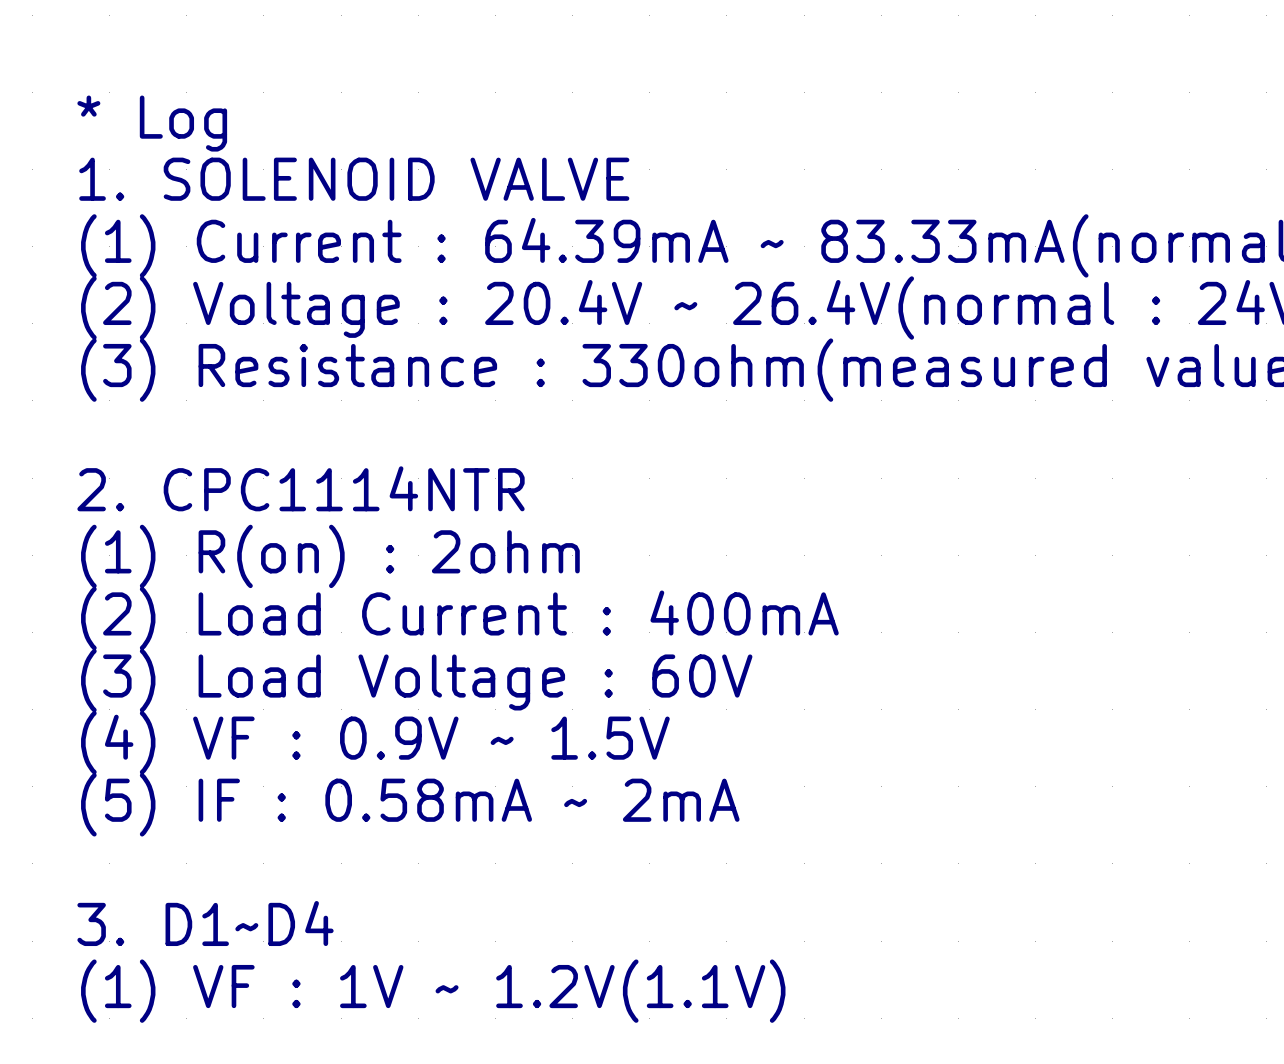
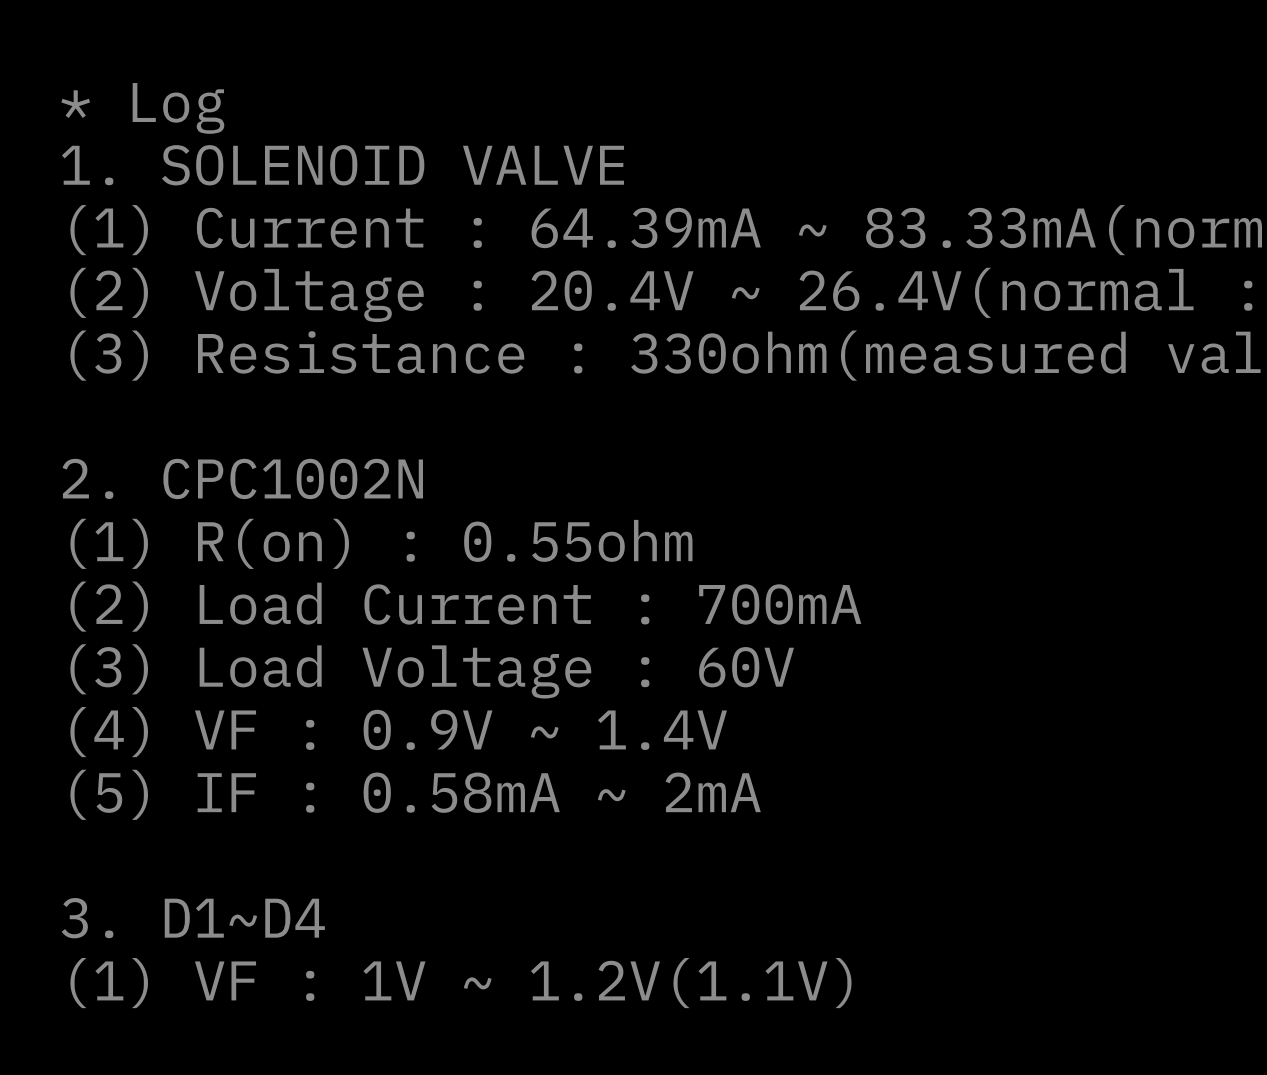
text: 2. CPC1114NTR (301, 488) -> 2. CPC1002N (242, 478)
text: (1) R(on) : 2ohm (330, 556) -> (1) R(on) : 0.55ohm (381, 543)
text: (2) Load Current : 400mA (459, 618) -> (2) Load Current : 700mA (465, 606)
text: (4) VF : 0.9V ~ 1.5V (375, 742) -> (4) VF : 0.9V ~ 1.4V (398, 732)

